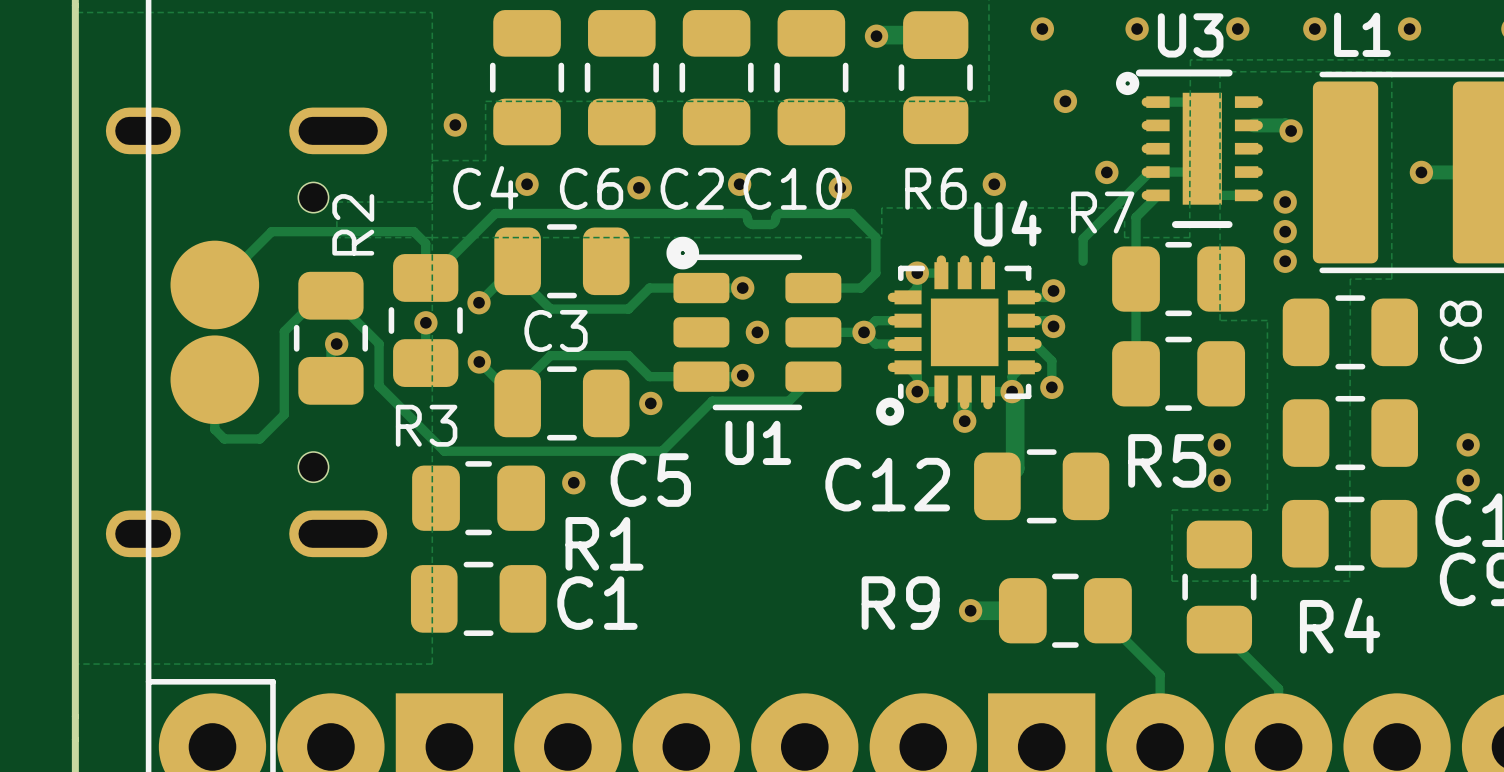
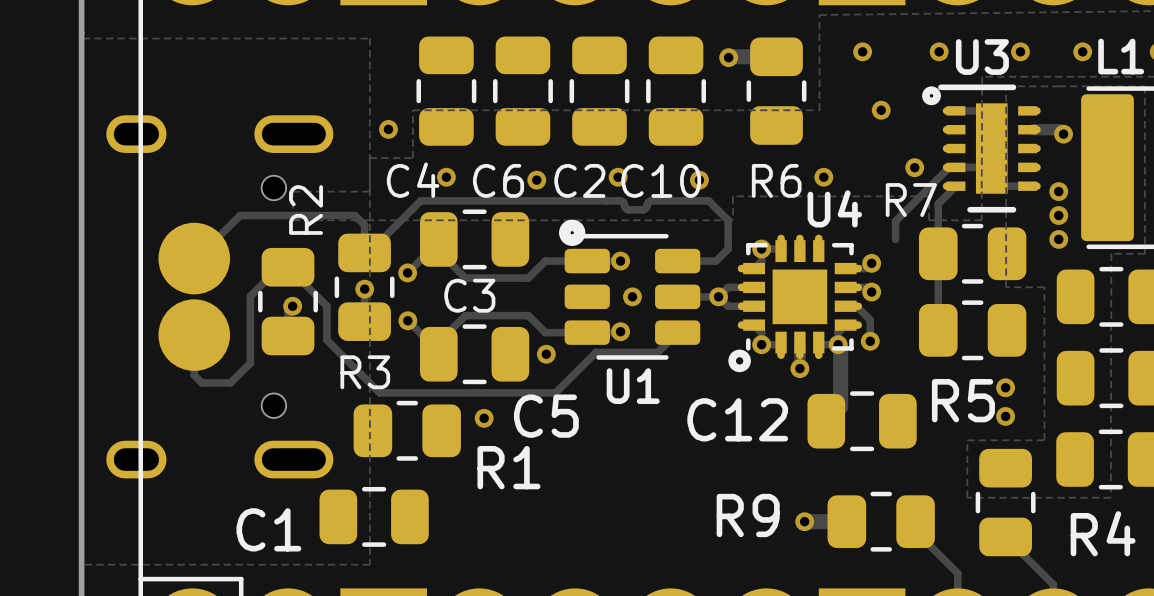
C1 position: (478, 598) -> (374, 516)
C1 name position: C1 (597, 603) -> C1 (268, 529)

